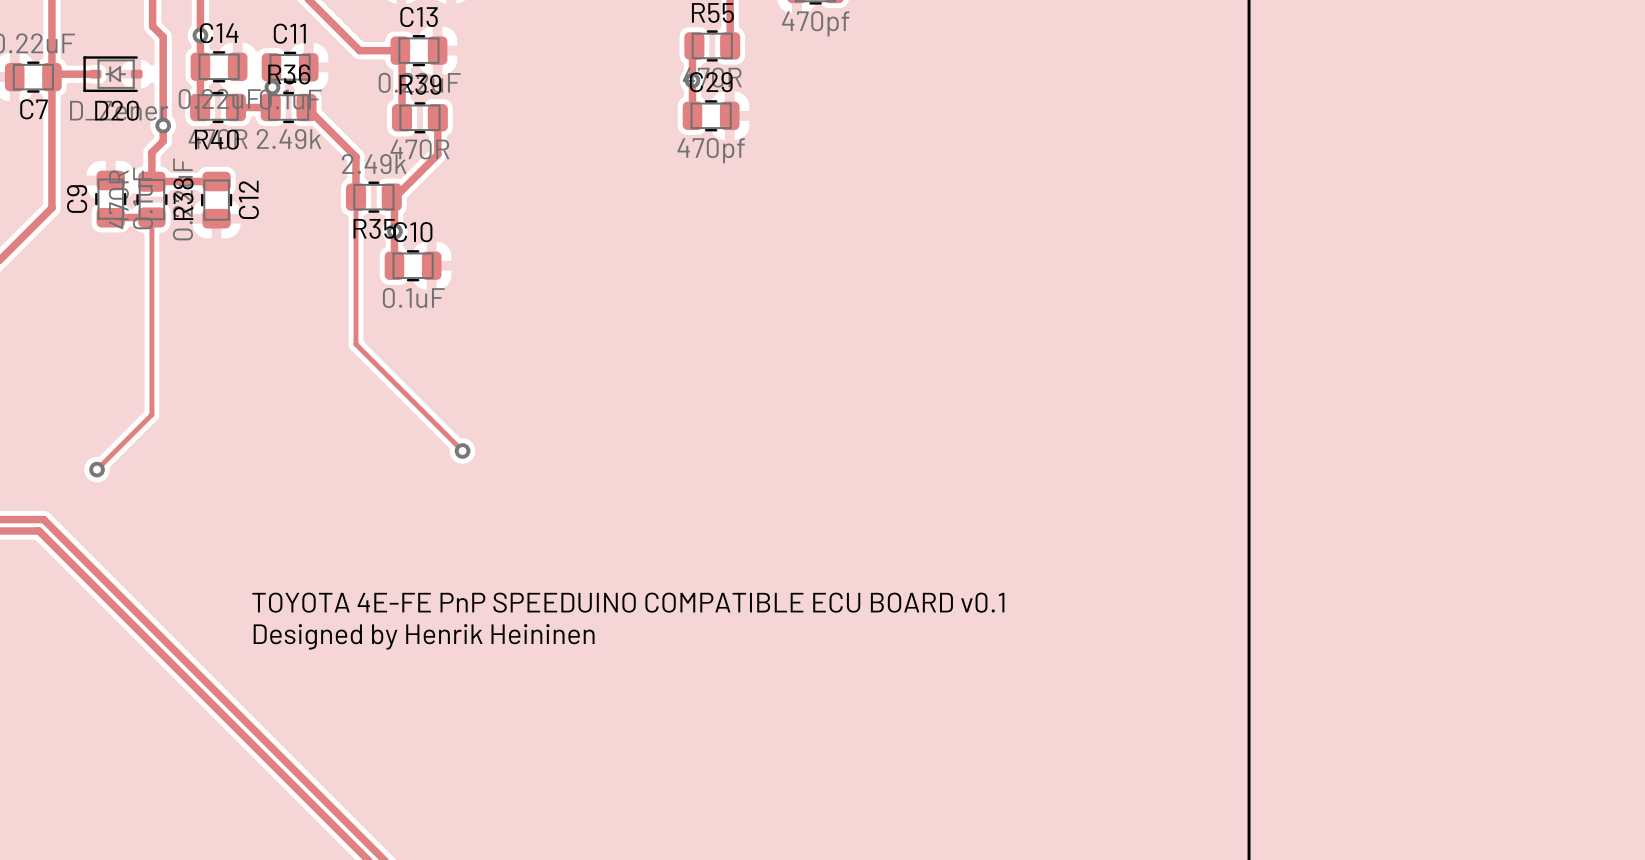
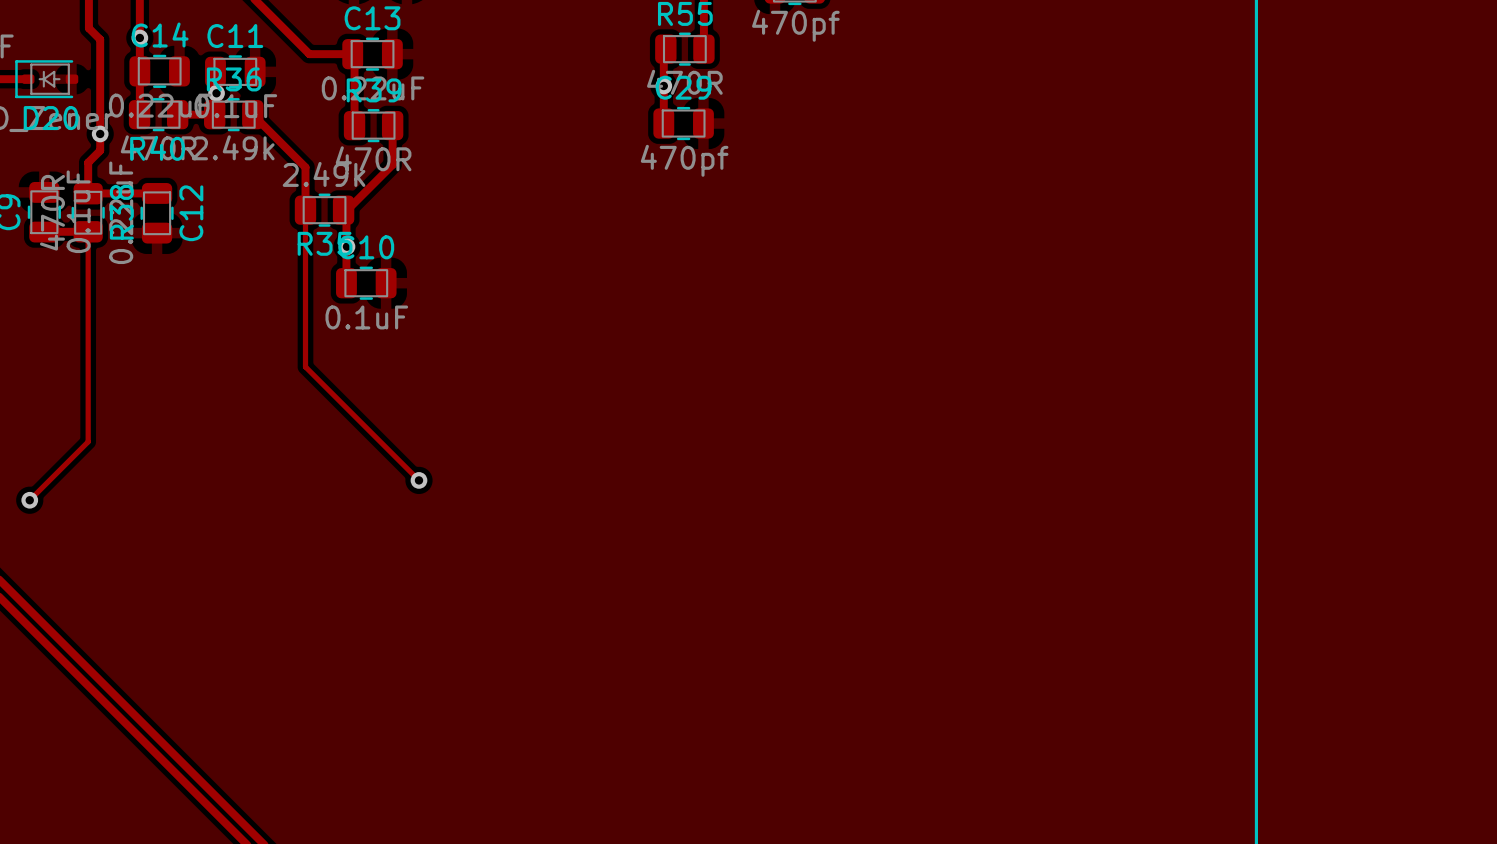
text: TOYOTA 4E-FE PnP SPEEDUINO COMPATIBLE ECU BOARD v0.1 (628, 602) -> none
text: Designed by Henrik Heininen (424, 636) -> none

